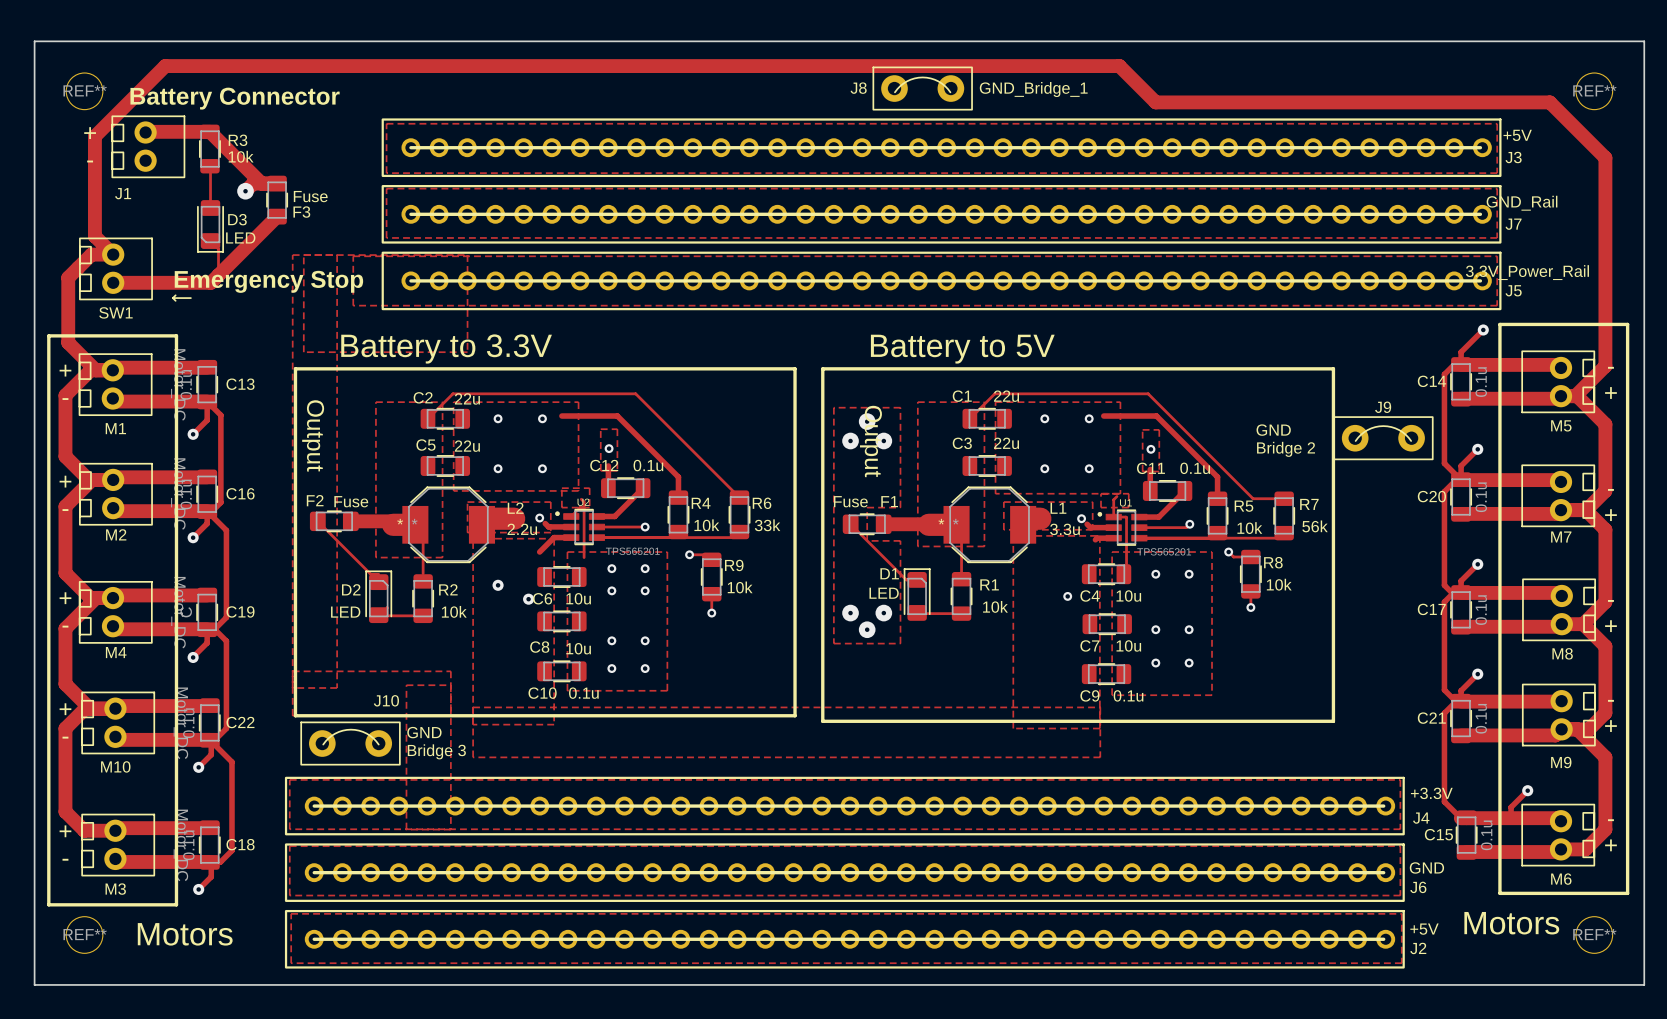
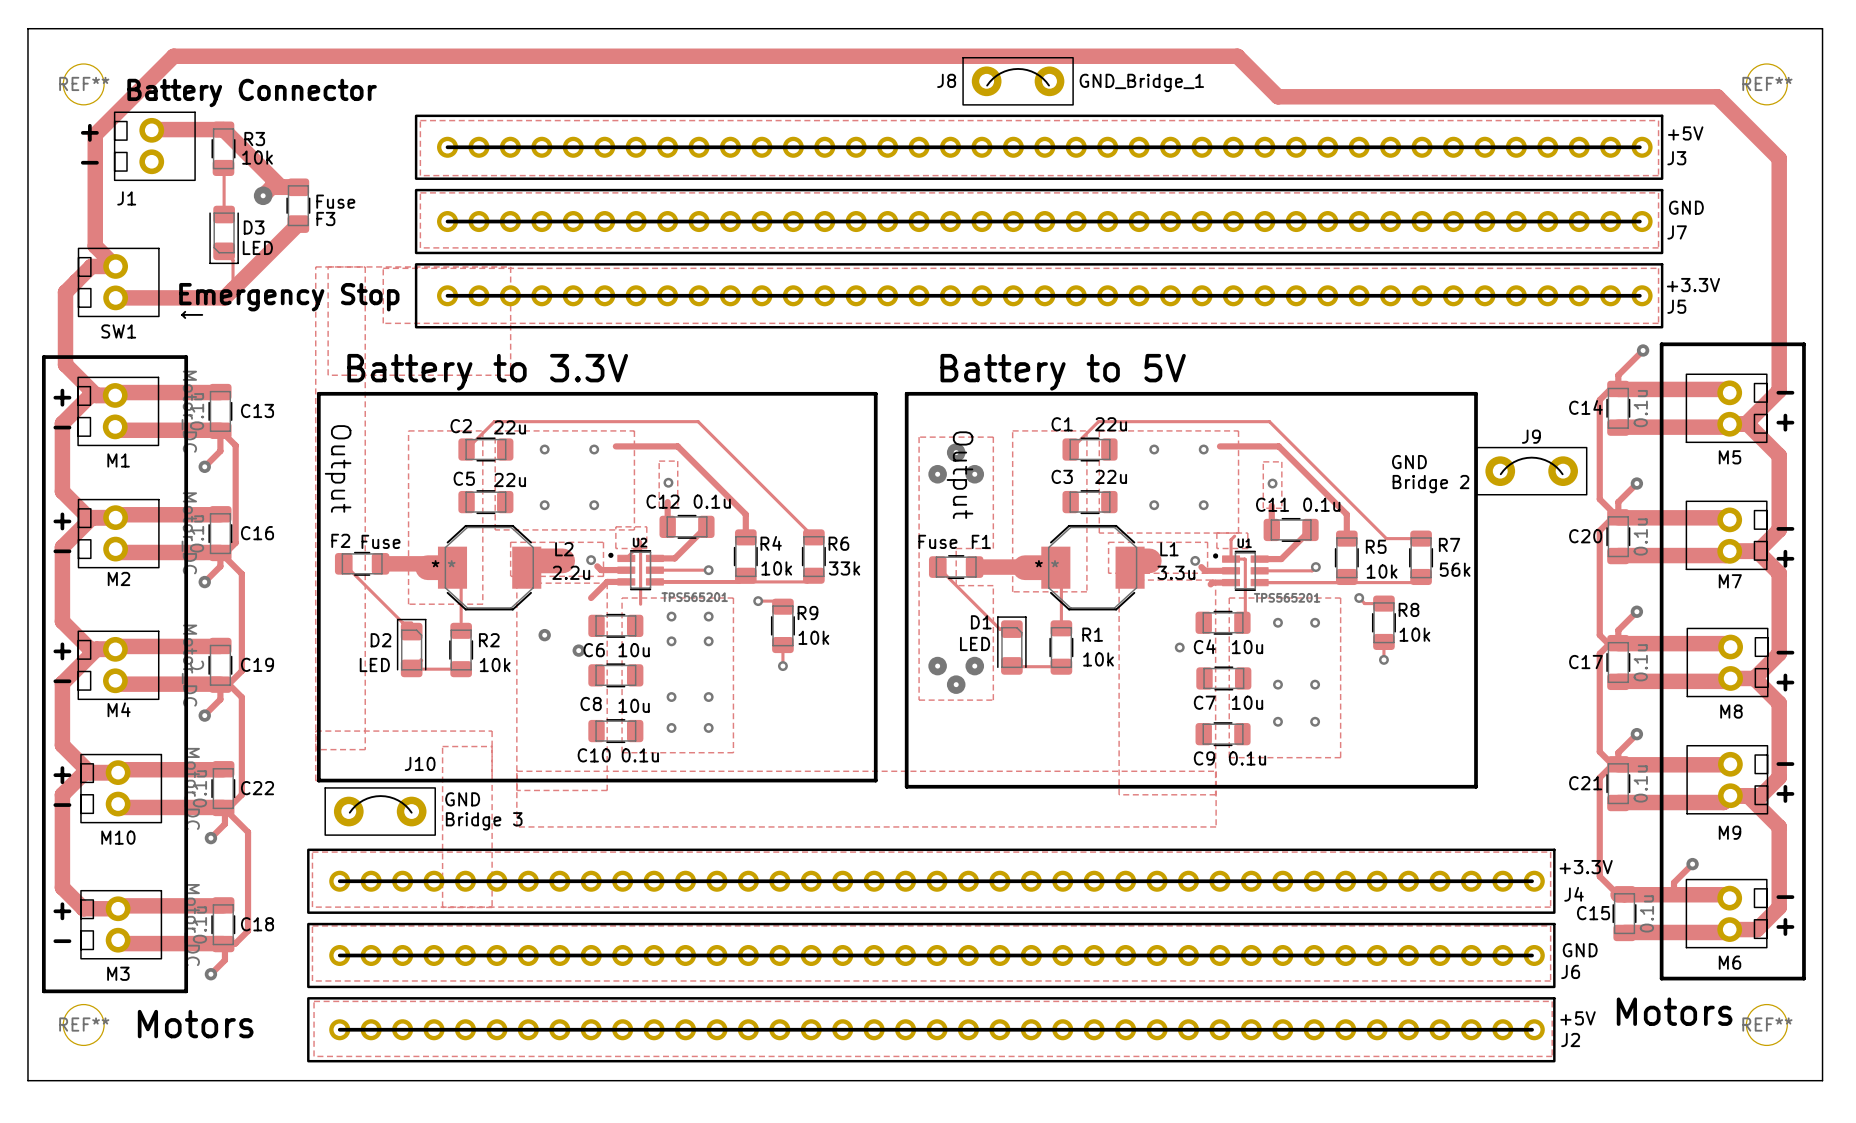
J7 value: GND_Rail (1522, 203) -> GND (1686, 207)
J5 value: 3.3V_Power_Rail (1527, 272) -> +3.3V (1693, 285)

